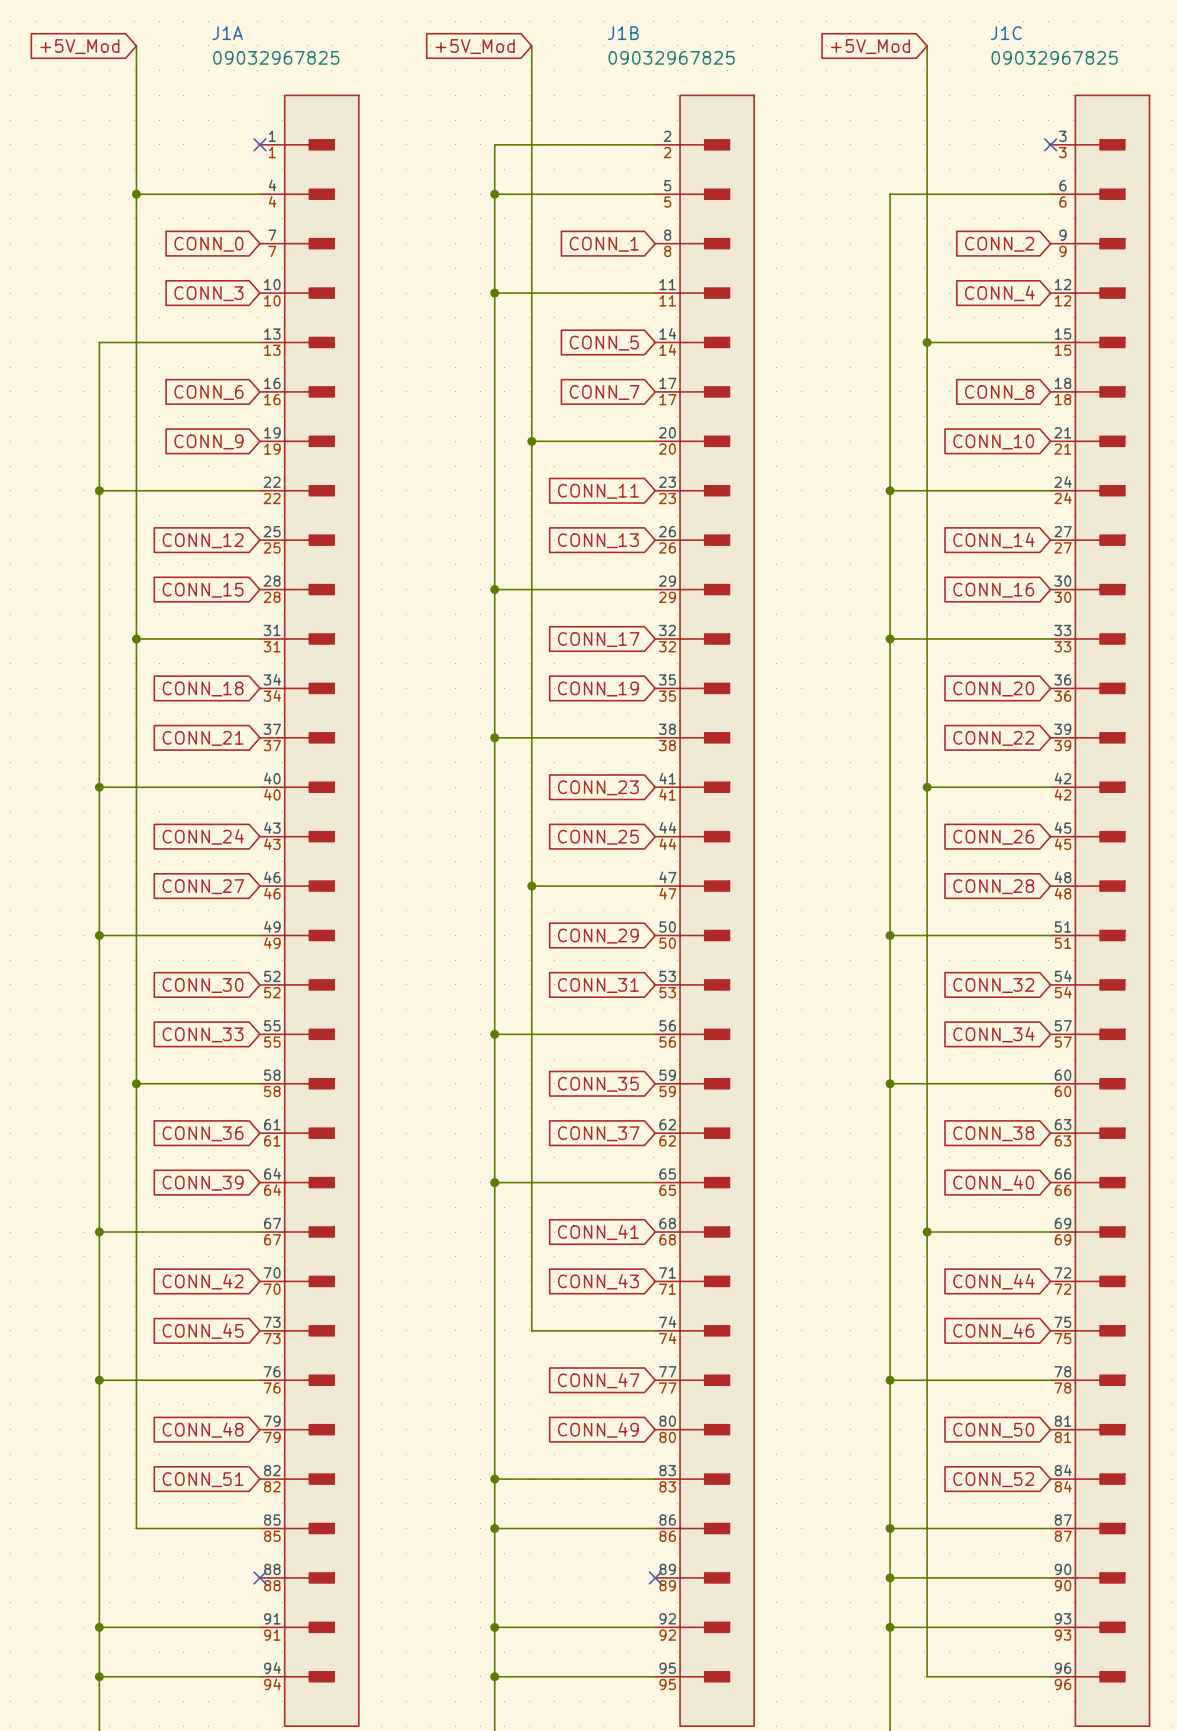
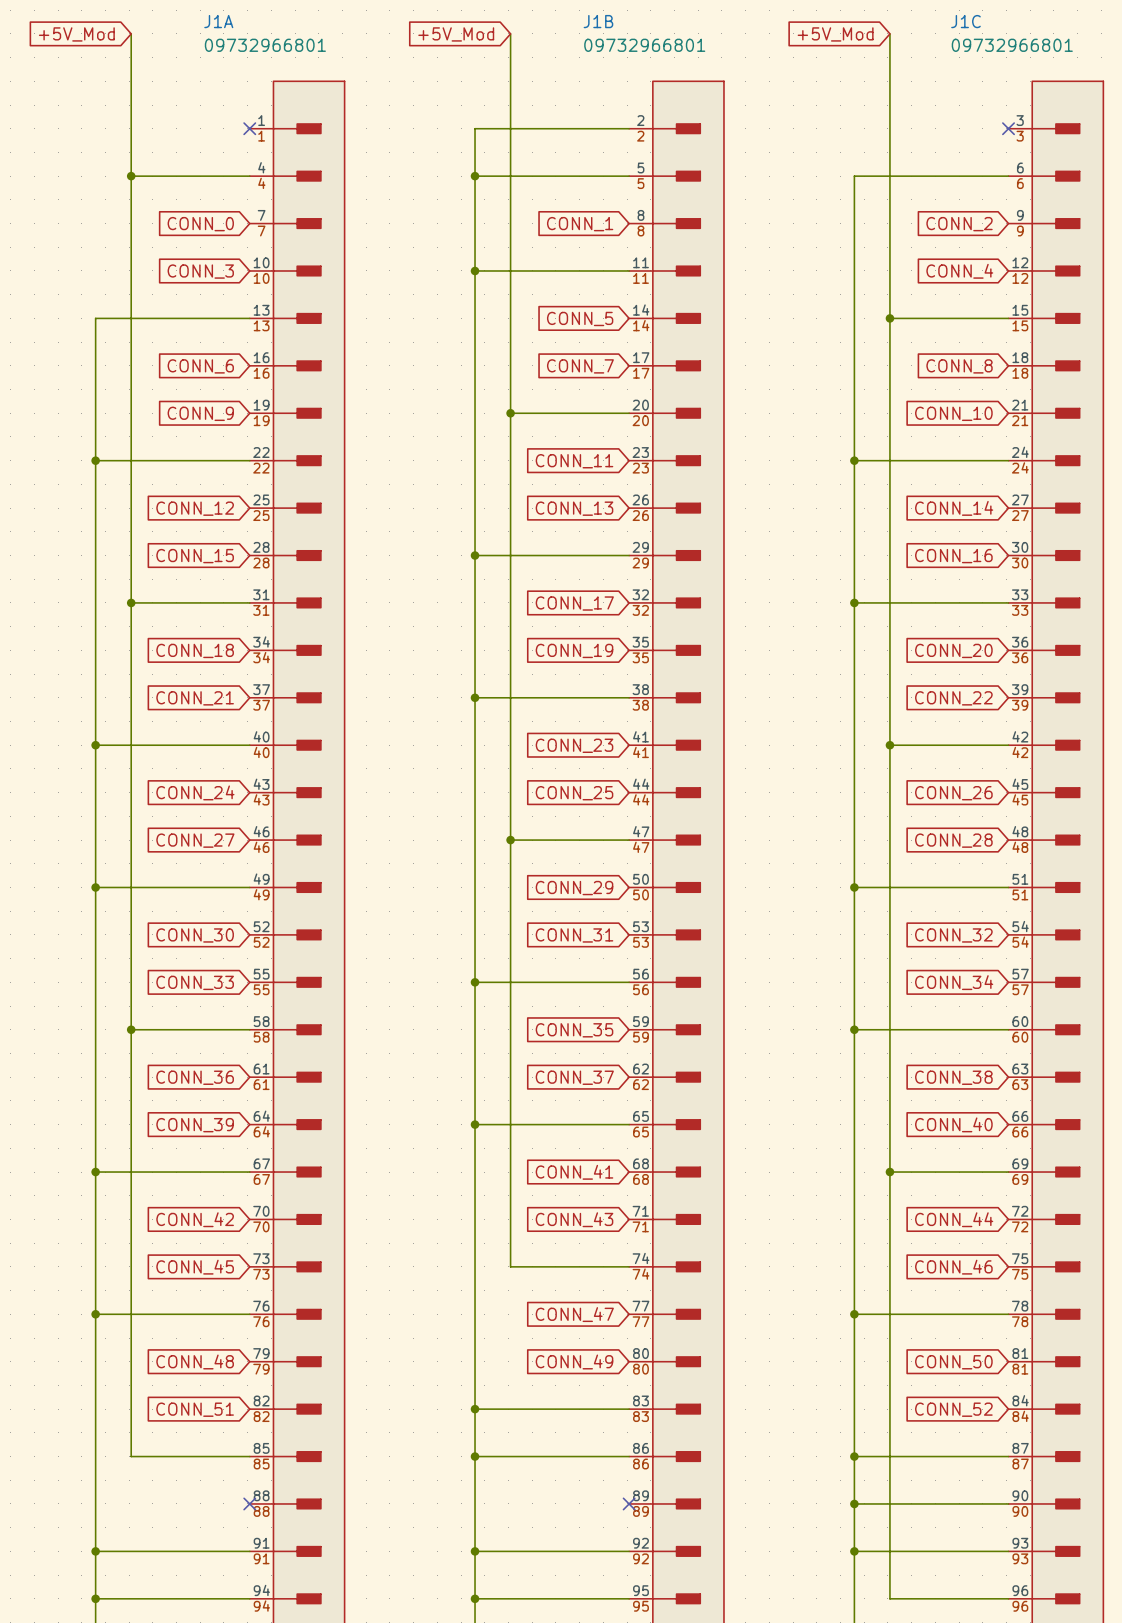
J1A value: 09032967825 (276, 57) -> 09732966801 (265, 45)
J1B value: 09032967825 (671, 57) -> 09732966801 (644, 45)
J1C value: 09032967825 (1054, 57) -> 09732966801 (1012, 45)

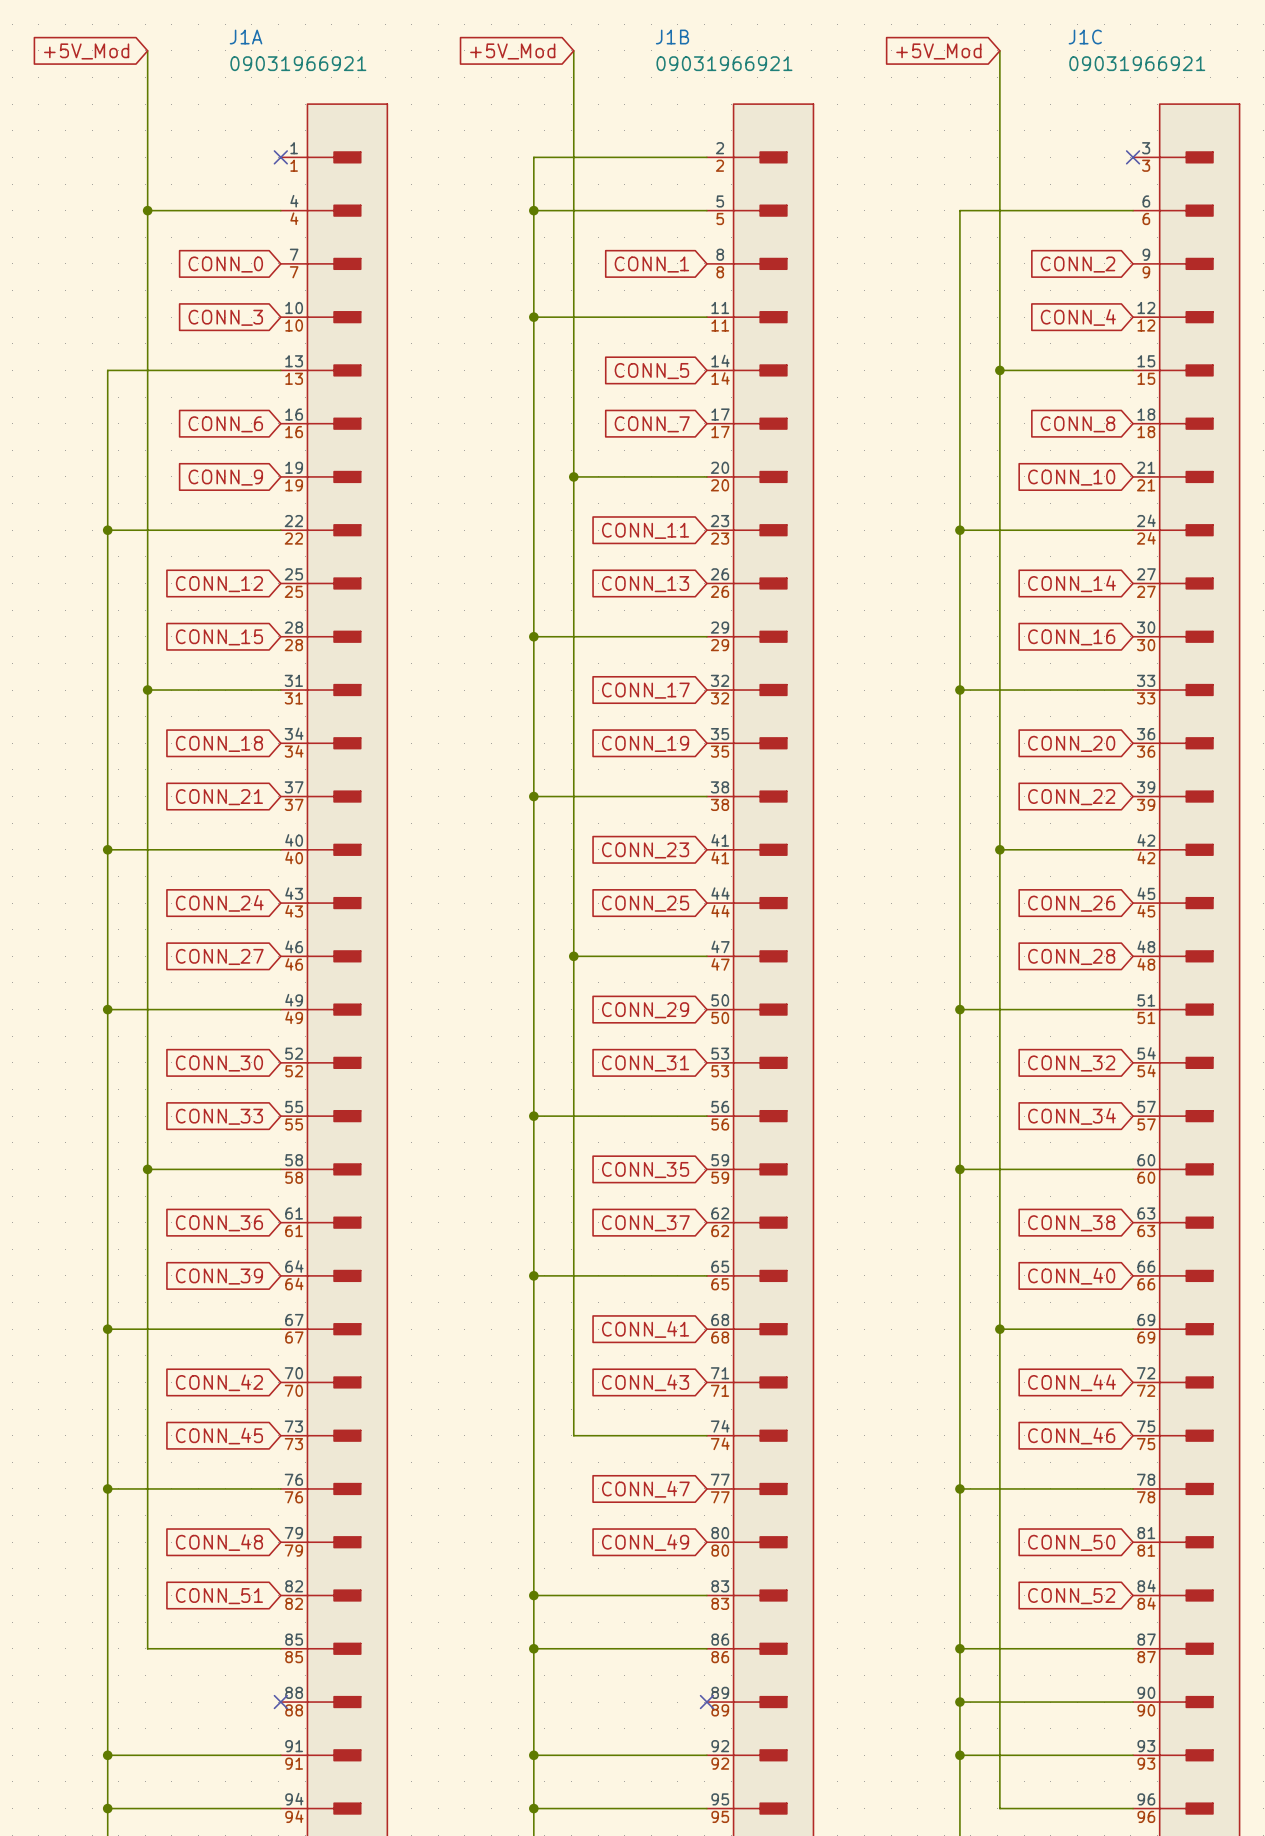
J1A value: 09732966801 (265, 45) -> 09031966921 (298, 63)
J1B value: 09732966801 (644, 45) -> 09031966921 (724, 63)
J1C value: 09732966801 (1012, 45) -> 09031966921 (1137, 63)

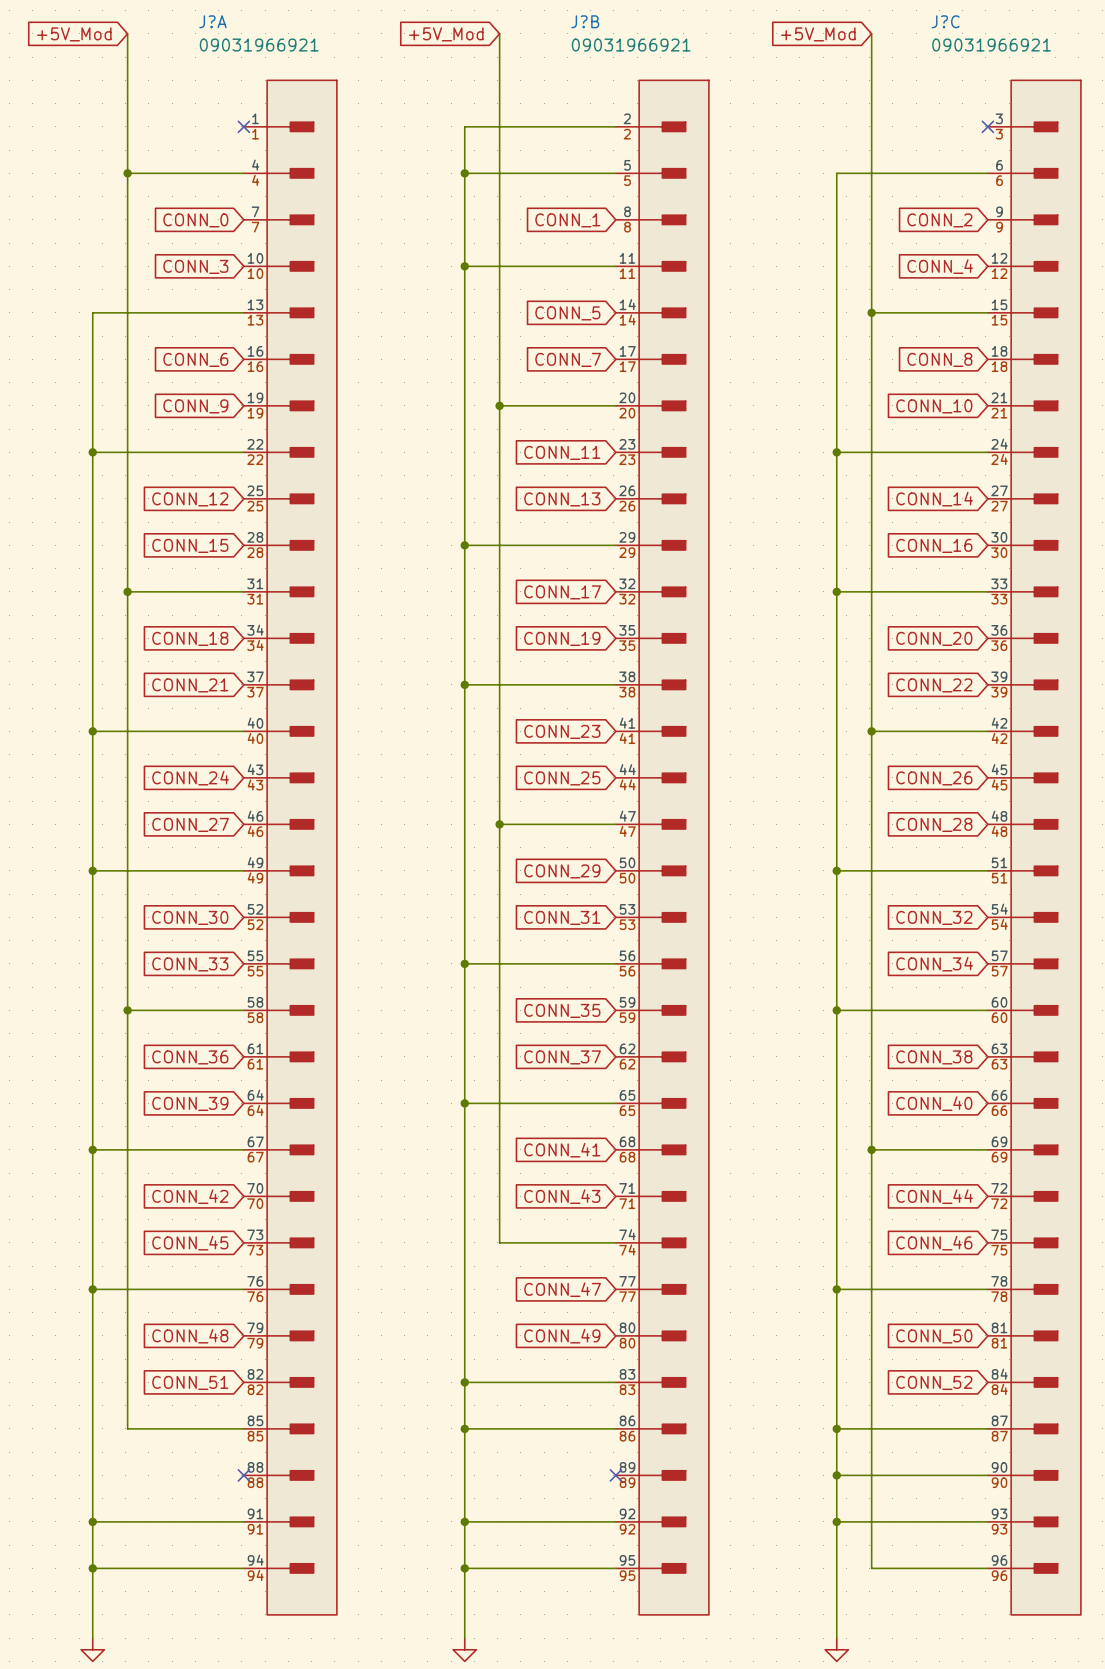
J1A name: J1A (246, 37) -> J?A (212, 21)
J1B name: J1B (672, 37) -> J?B (585, 21)
J1C name: J1C (1085, 37) -> J?C (945, 21)

